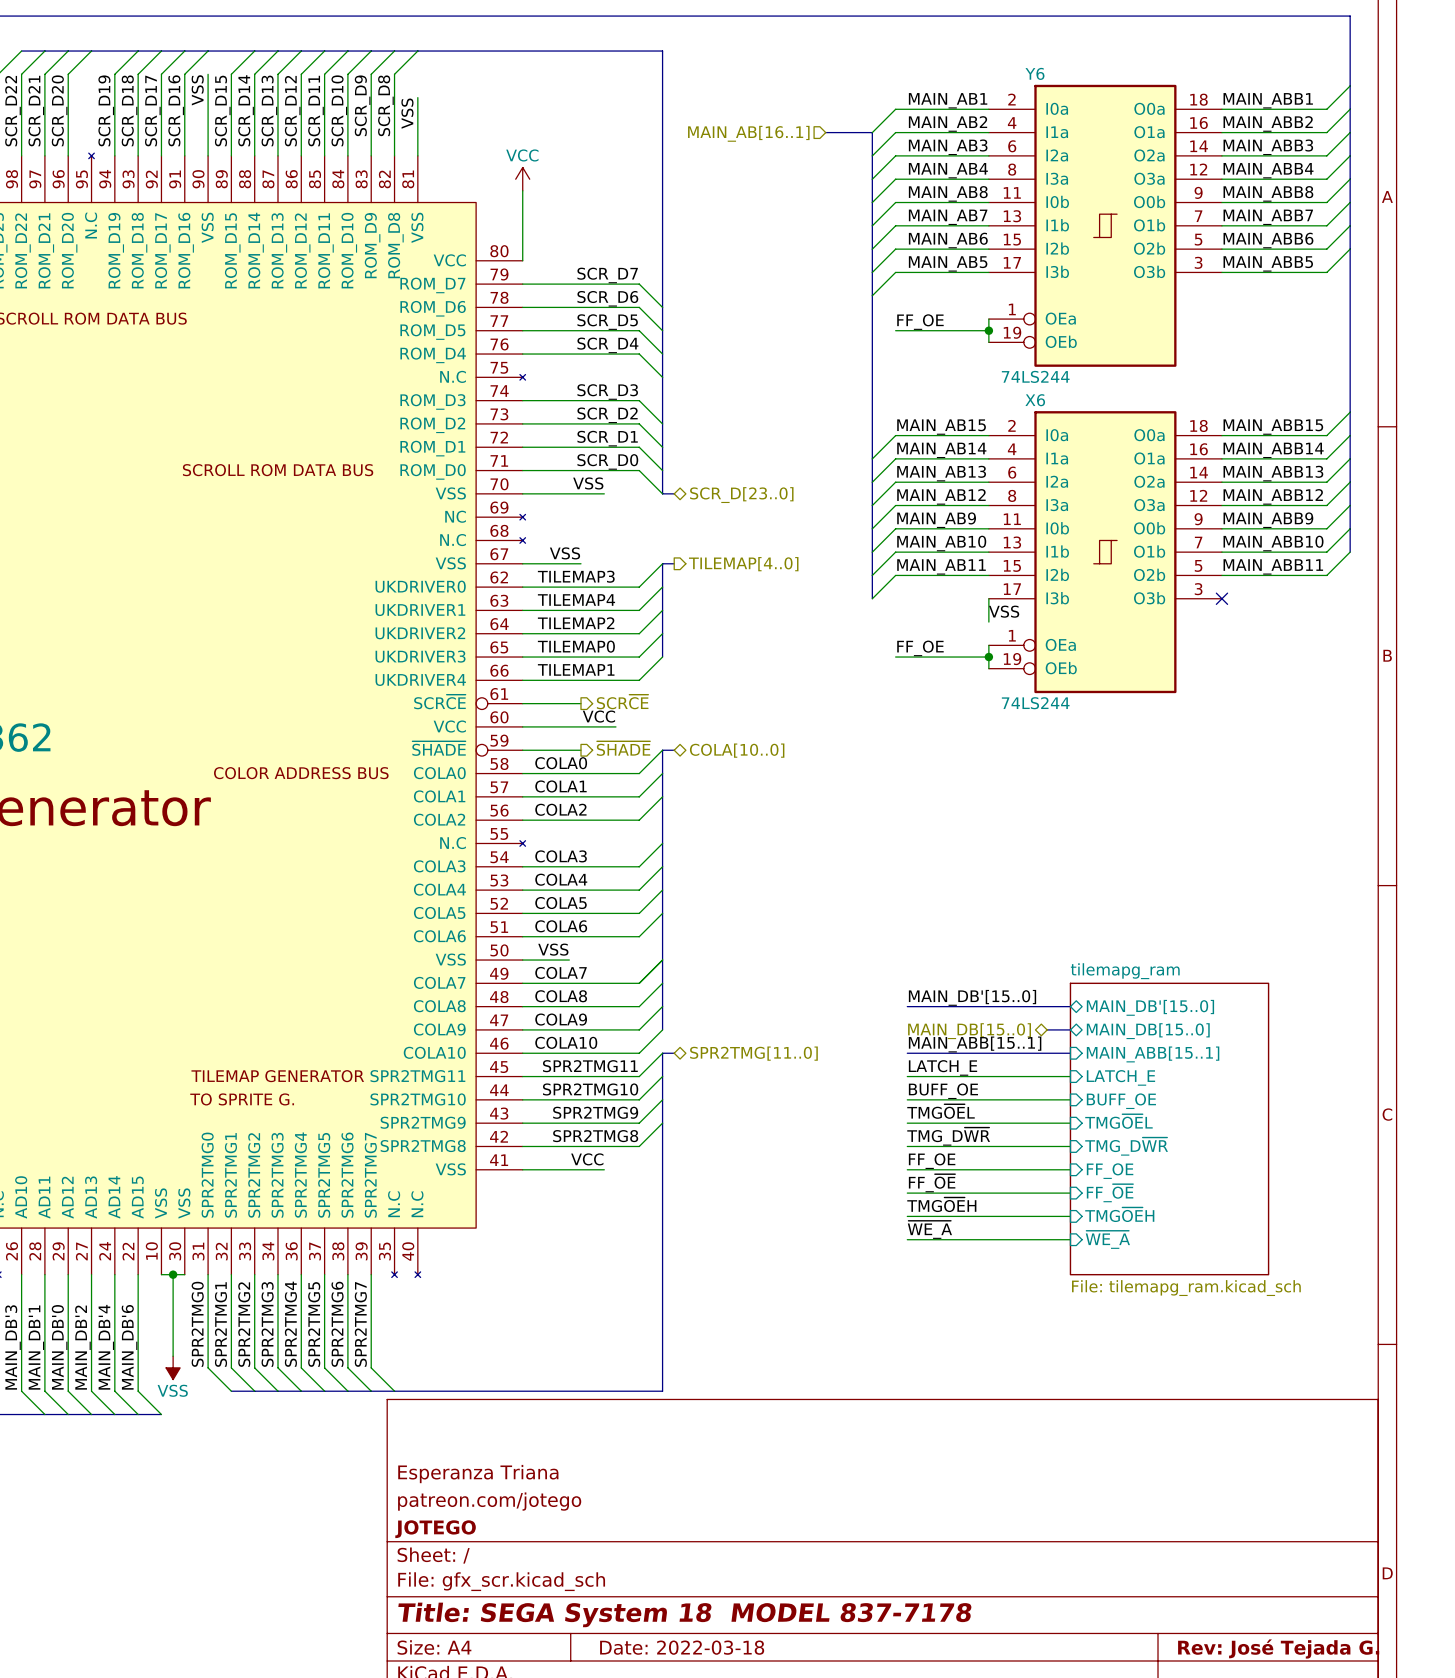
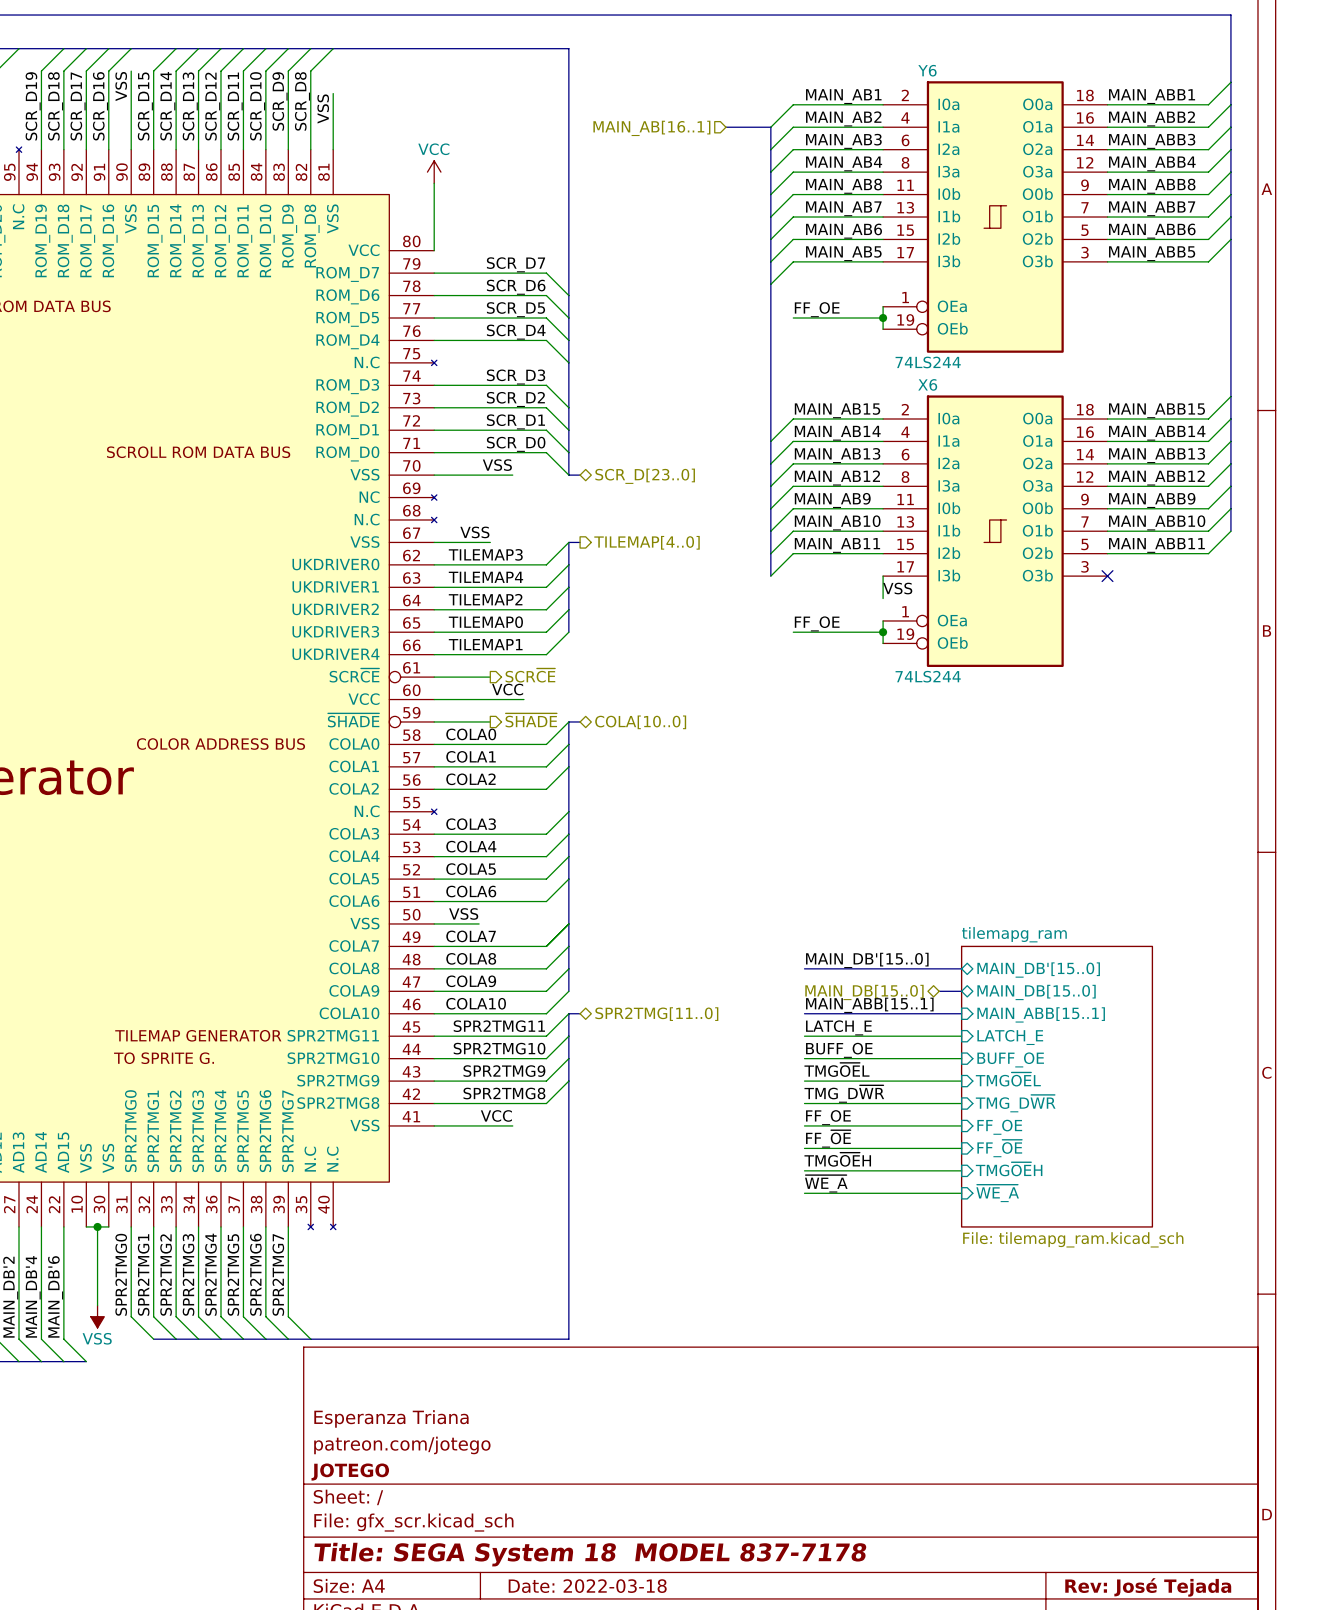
title block: Rev: José Tejada G. (1278, 1649) -> Rev: José Tejada (1148, 1587)

